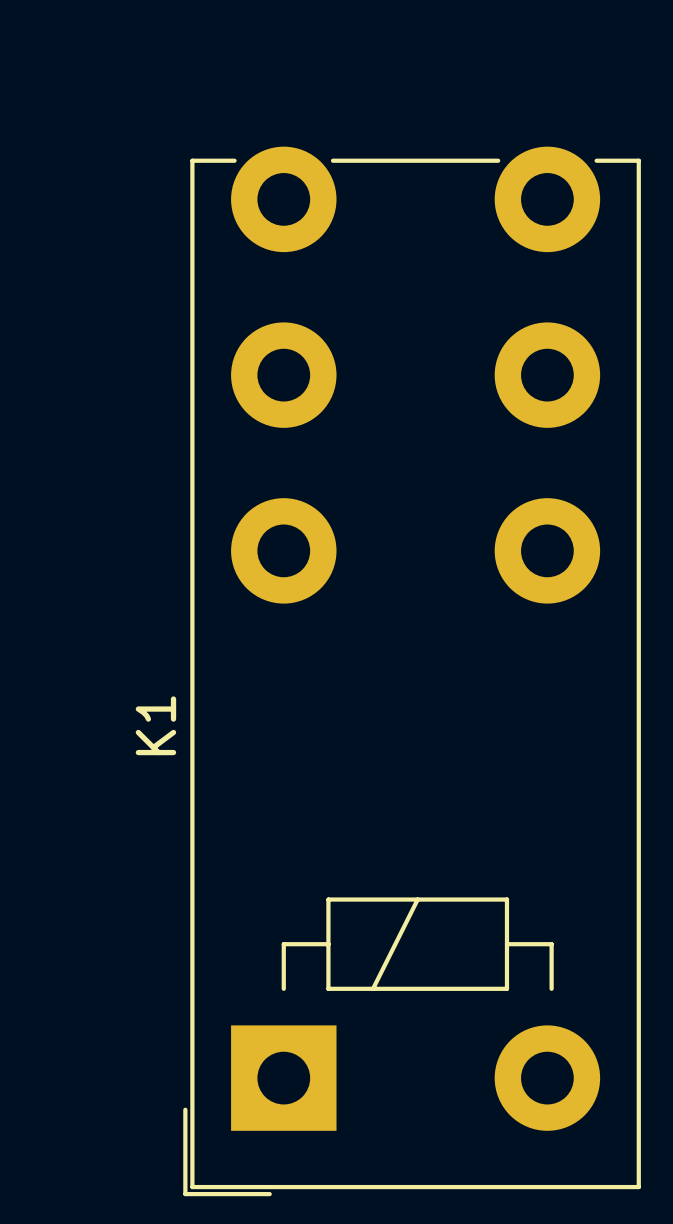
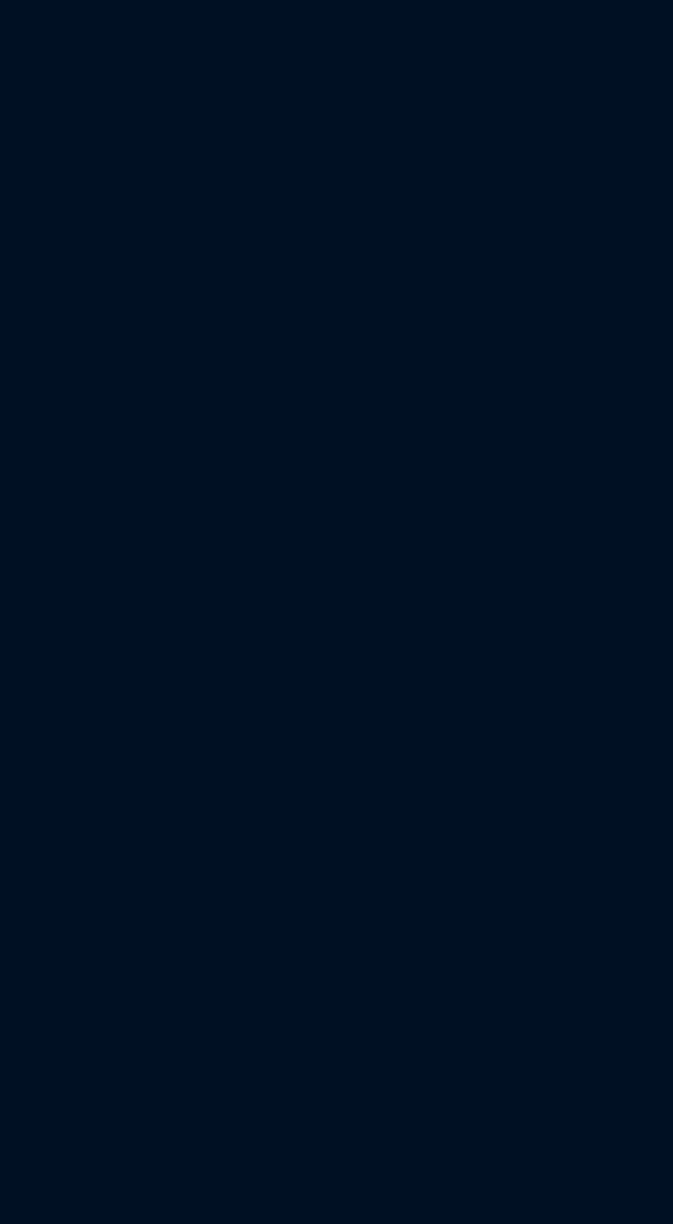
K1: (412, 671) -> none

